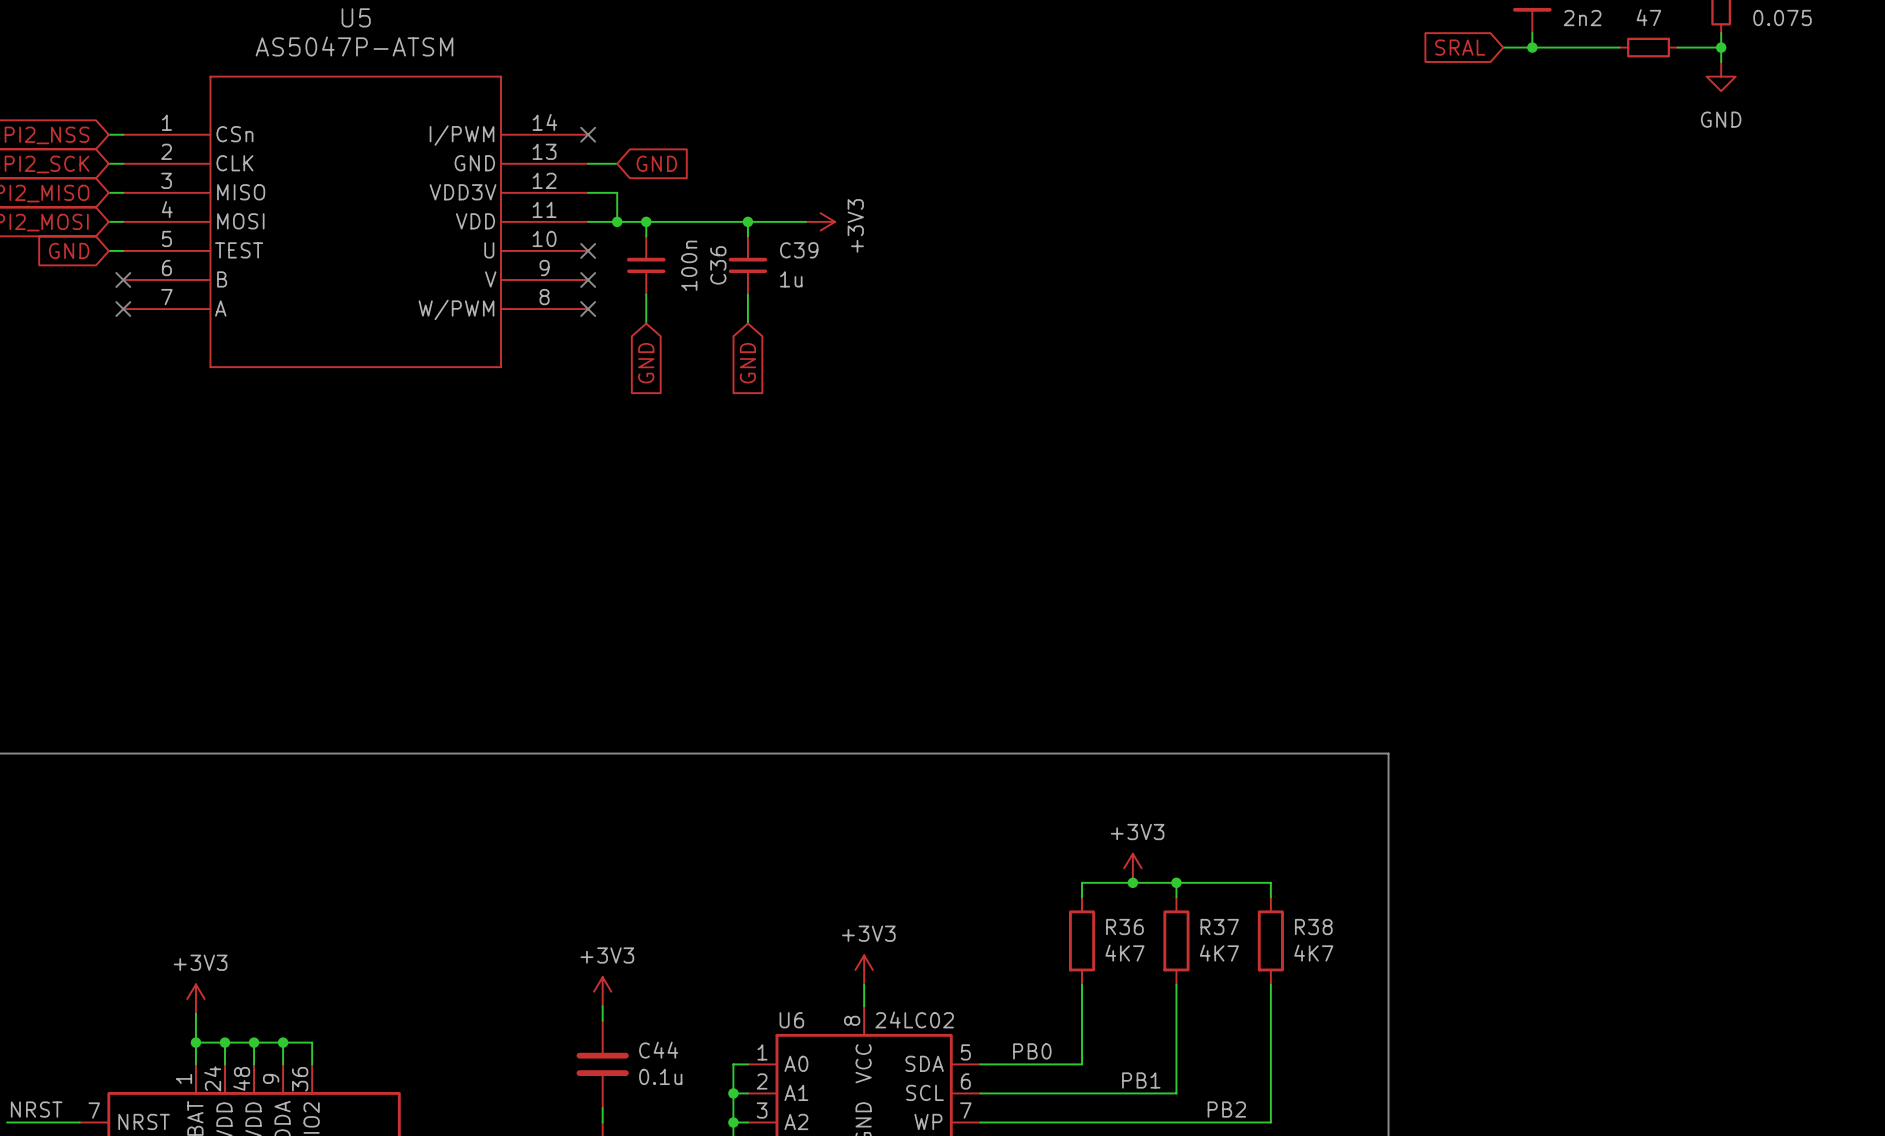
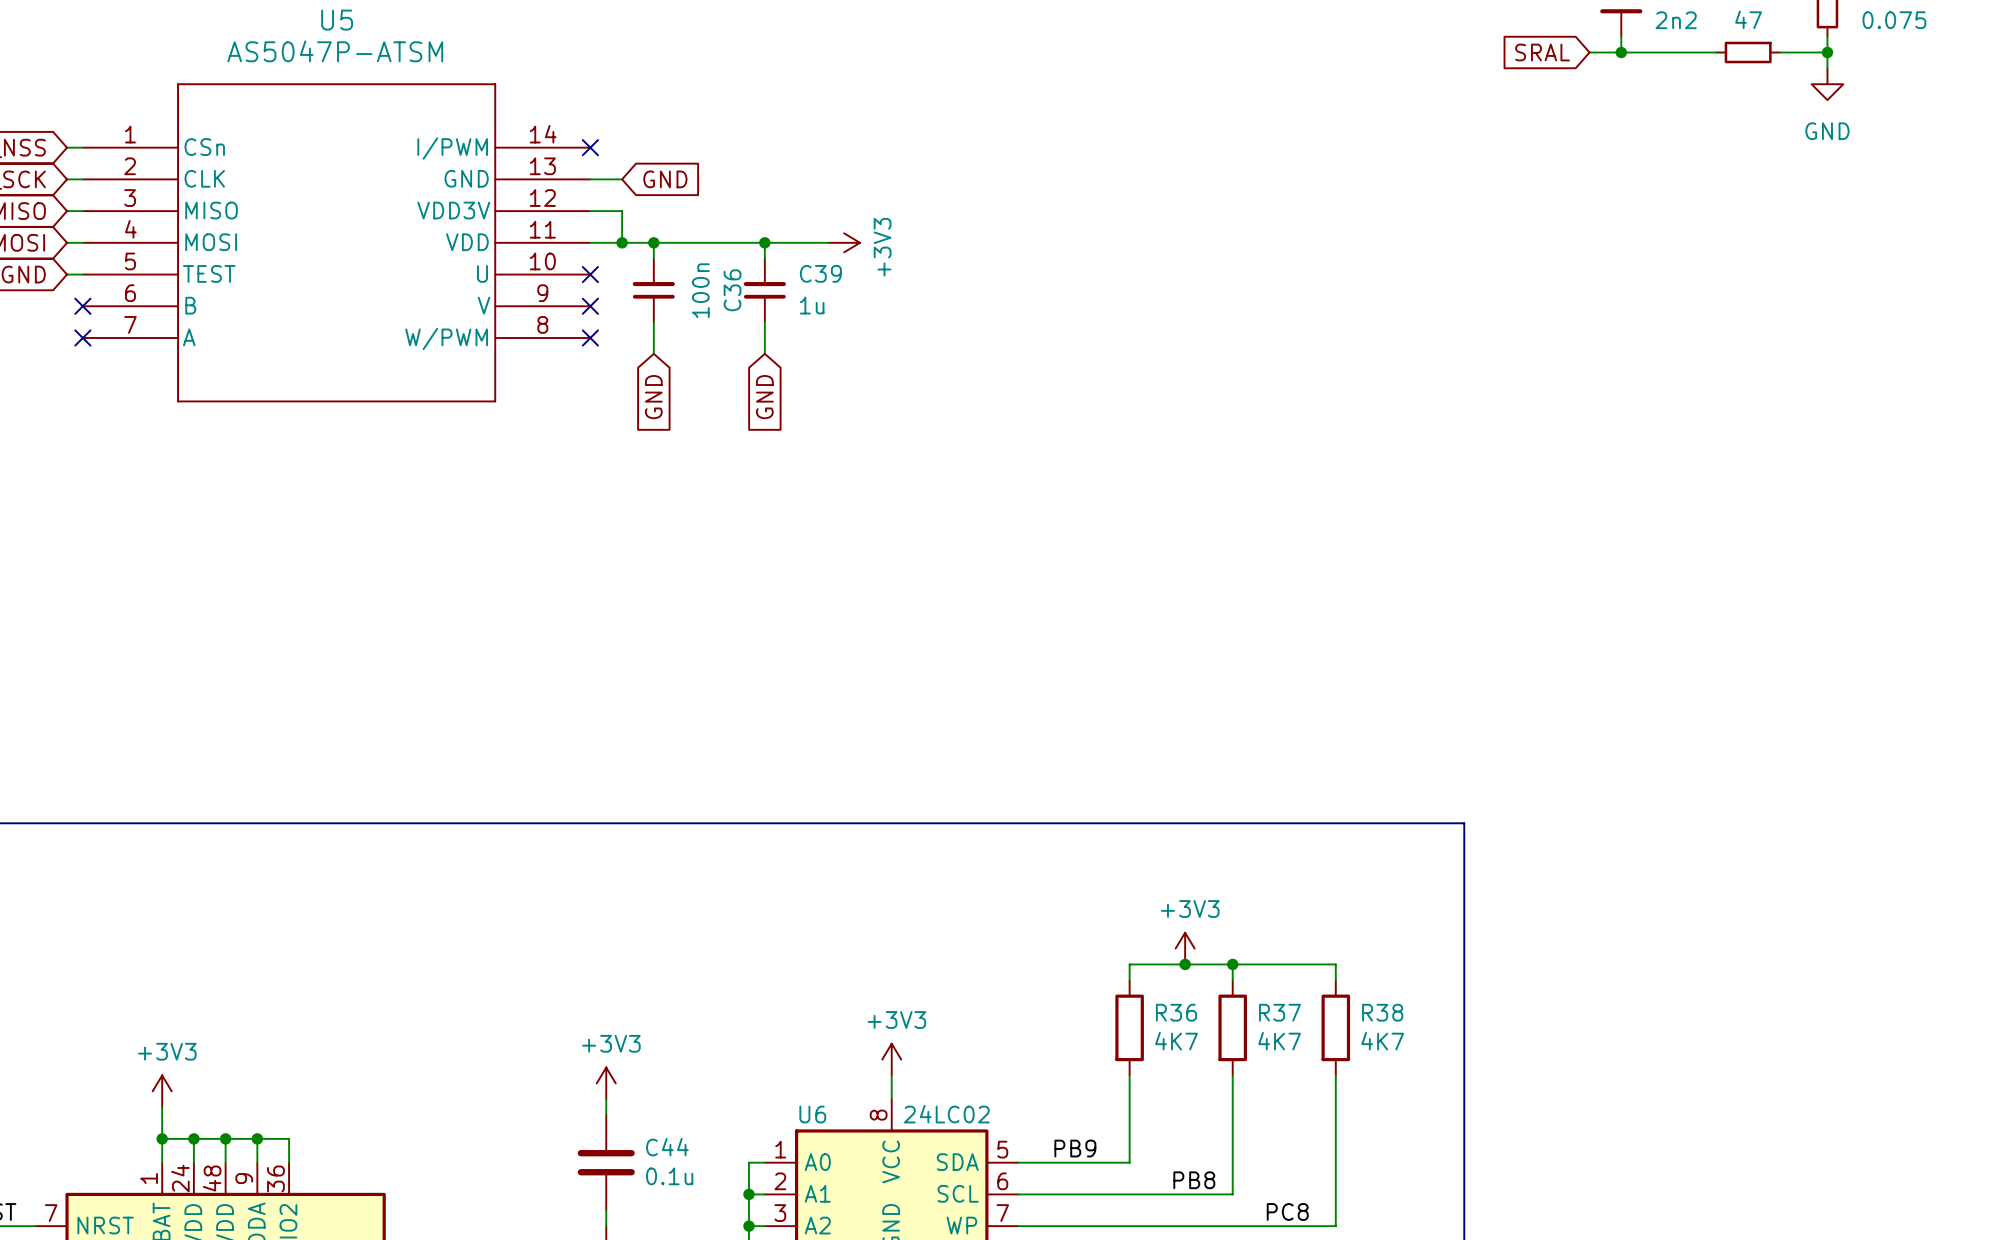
label: PB0 (1032, 1051) -> PB9 (1075, 1148)
label: PB1 (1141, 1080) -> PB8 (1194, 1180)
label: PB2 (1226, 1109) -> PC8 (1287, 1211)

